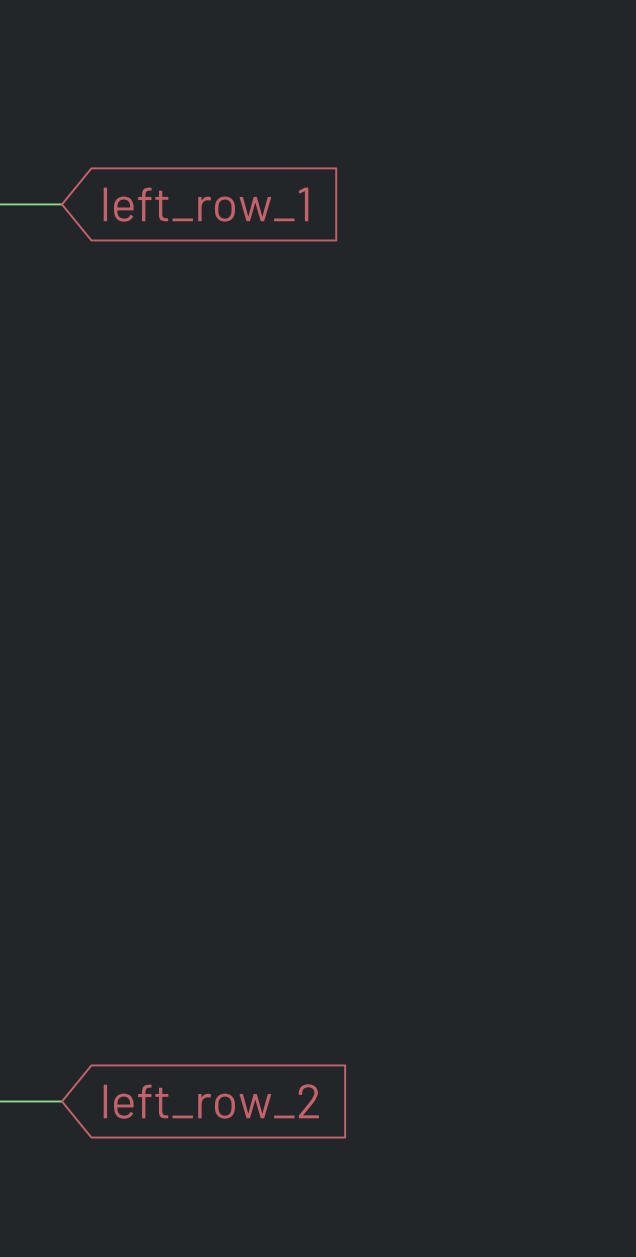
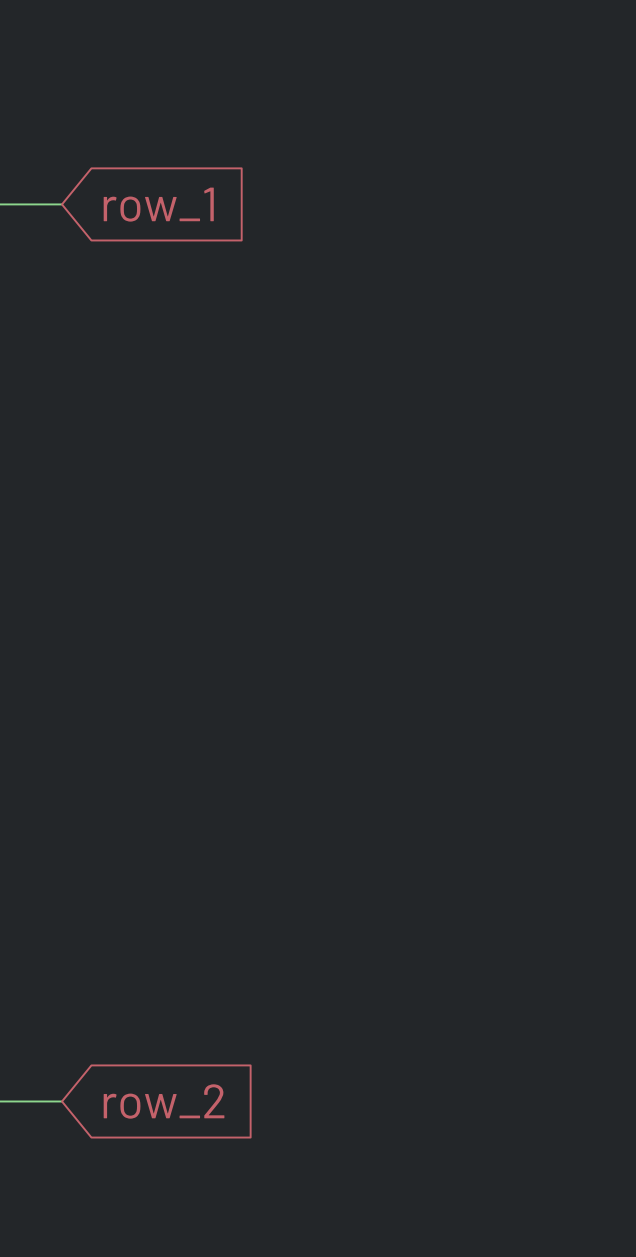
global label: left_row_1 (206, 204) -> row_1 (158, 204)
global label: left_row_2 (211, 1101) -> row_2 (164, 1101)

